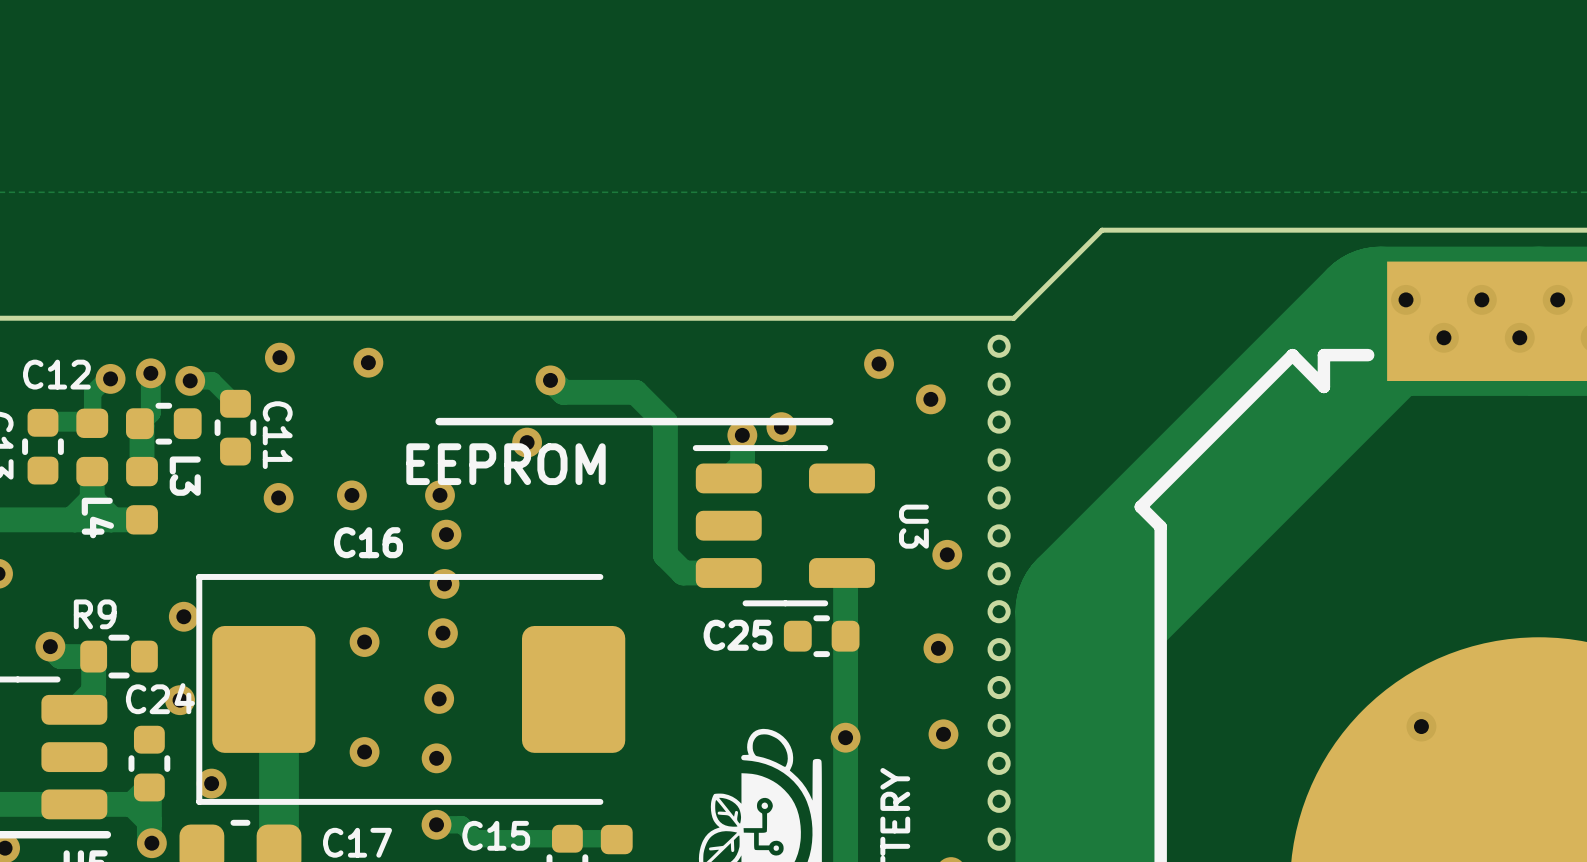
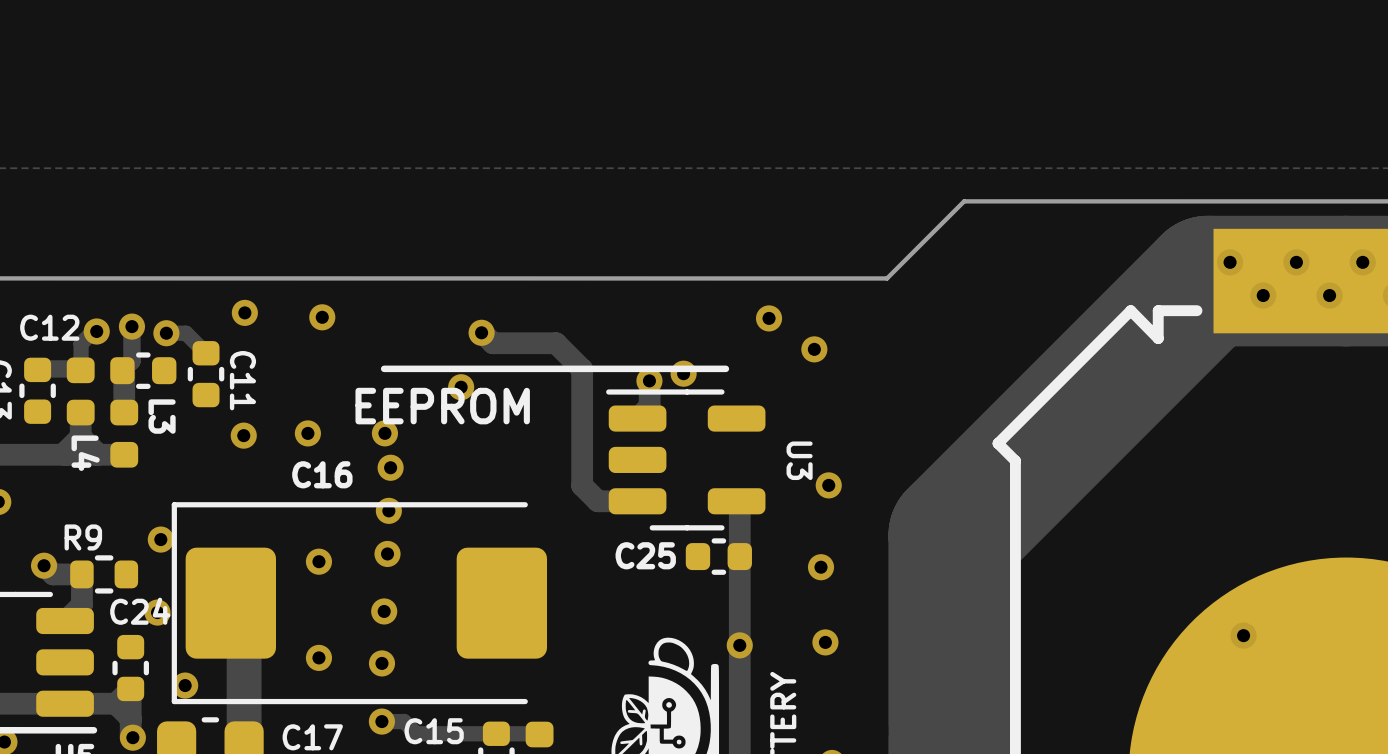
round board edge: [987, 334, 1011, 358] -> none
round board edge: [987, 372, 1011, 396] -> none
round board edge: [987, 410, 1011, 434] -> none
round board edge: [987, 448, 1011, 472] -> none
round board edge: [987, 486, 1011, 510] -> none
round board edge: [987, 524, 1011, 548] -> none
round board edge: [987, 562, 1011, 586] -> none
round board edge: [987, 600, 1011, 624] -> none
round board edge: [987, 638, 1011, 662] -> none
round board edge: [987, 675, 1011, 700] -> none
round board edge: [987, 713, 1011, 738] -> none
round board edge: [987, 751, 1011, 775] -> none
round board edge: [987, 789, 1011, 813] -> none
round board edge: [987, 827, 1011, 851] -> none

